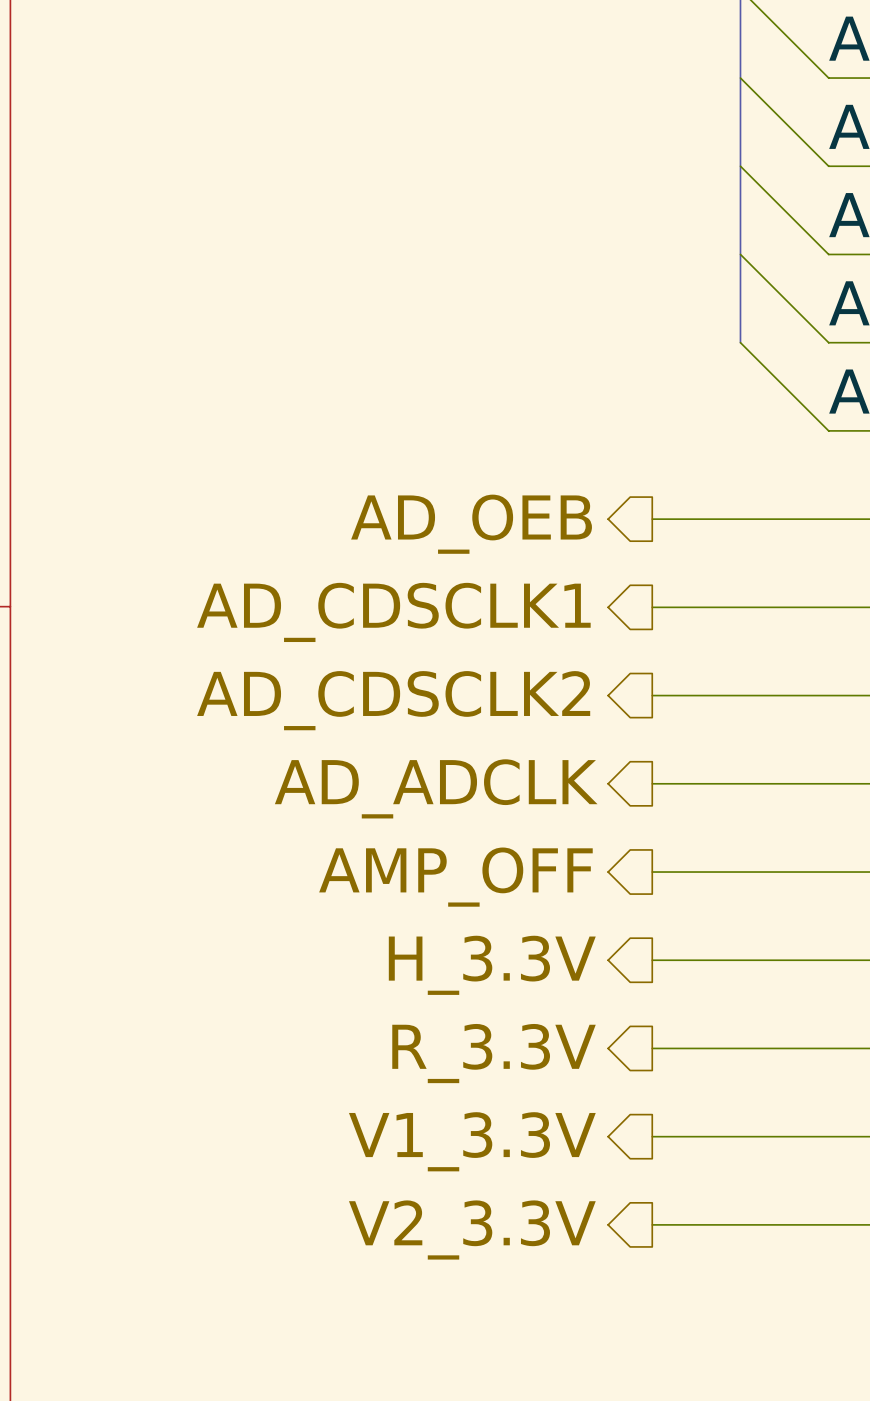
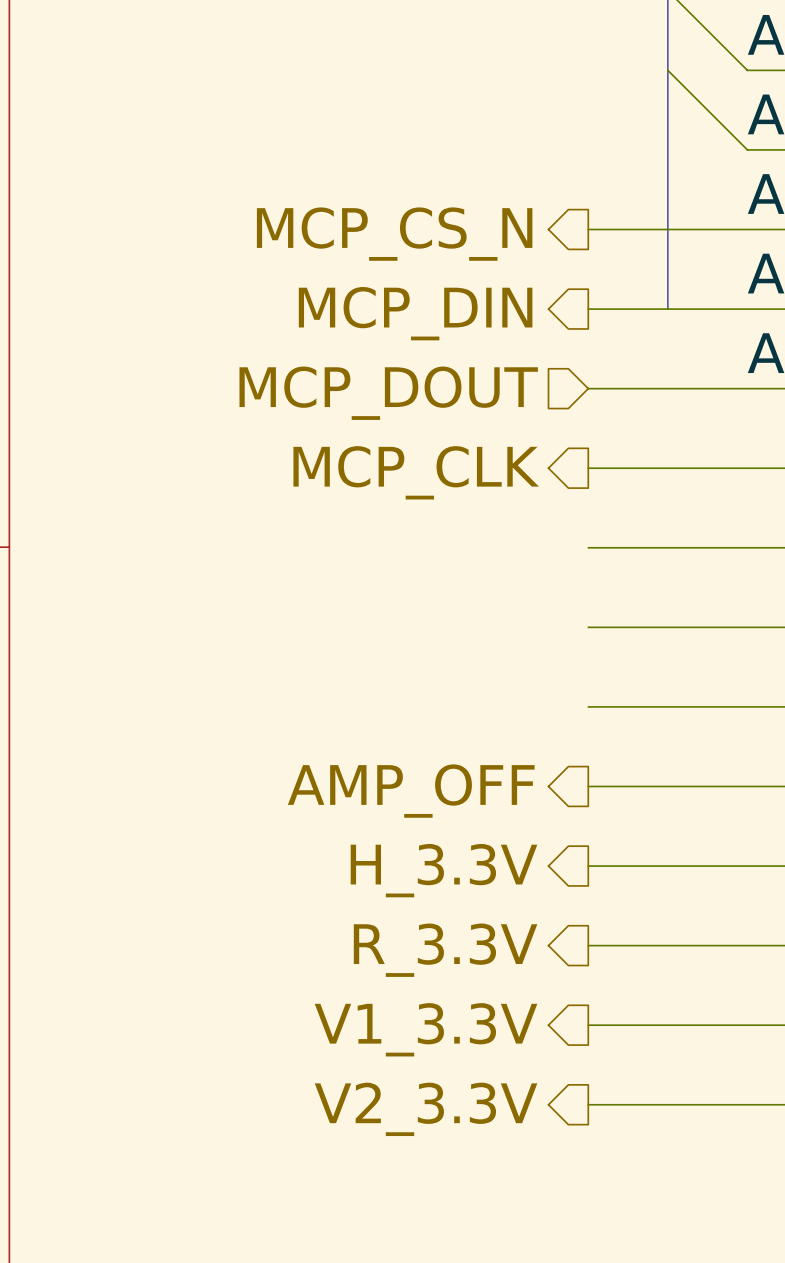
wire: (740, 166) (828, 254) -> (588, 229) (747, 229)
wire: (740, 254) (828, 342) -> (588, 309) (747, 309)
hierarchical label: none -> MCP_CS_N (394, 234)
wire: (740, 342) (828, 430) -> (588, 388) (747, 388)
hierarchical label: none -> MCP_DIN (415, 313)
hierarchical label: none -> MCP_DOUT (388, 393)
hierarchical label: AD_OEB (471, 524) -> MCP_CLK (416, 472)
hierarchical label: AD_CDSCLK1 (393, 612) -> none
hierarchical label: AD_CDSCLK2 (393, 700) -> none
hierarchical label: AD_ADCLK (436, 788) -> none

